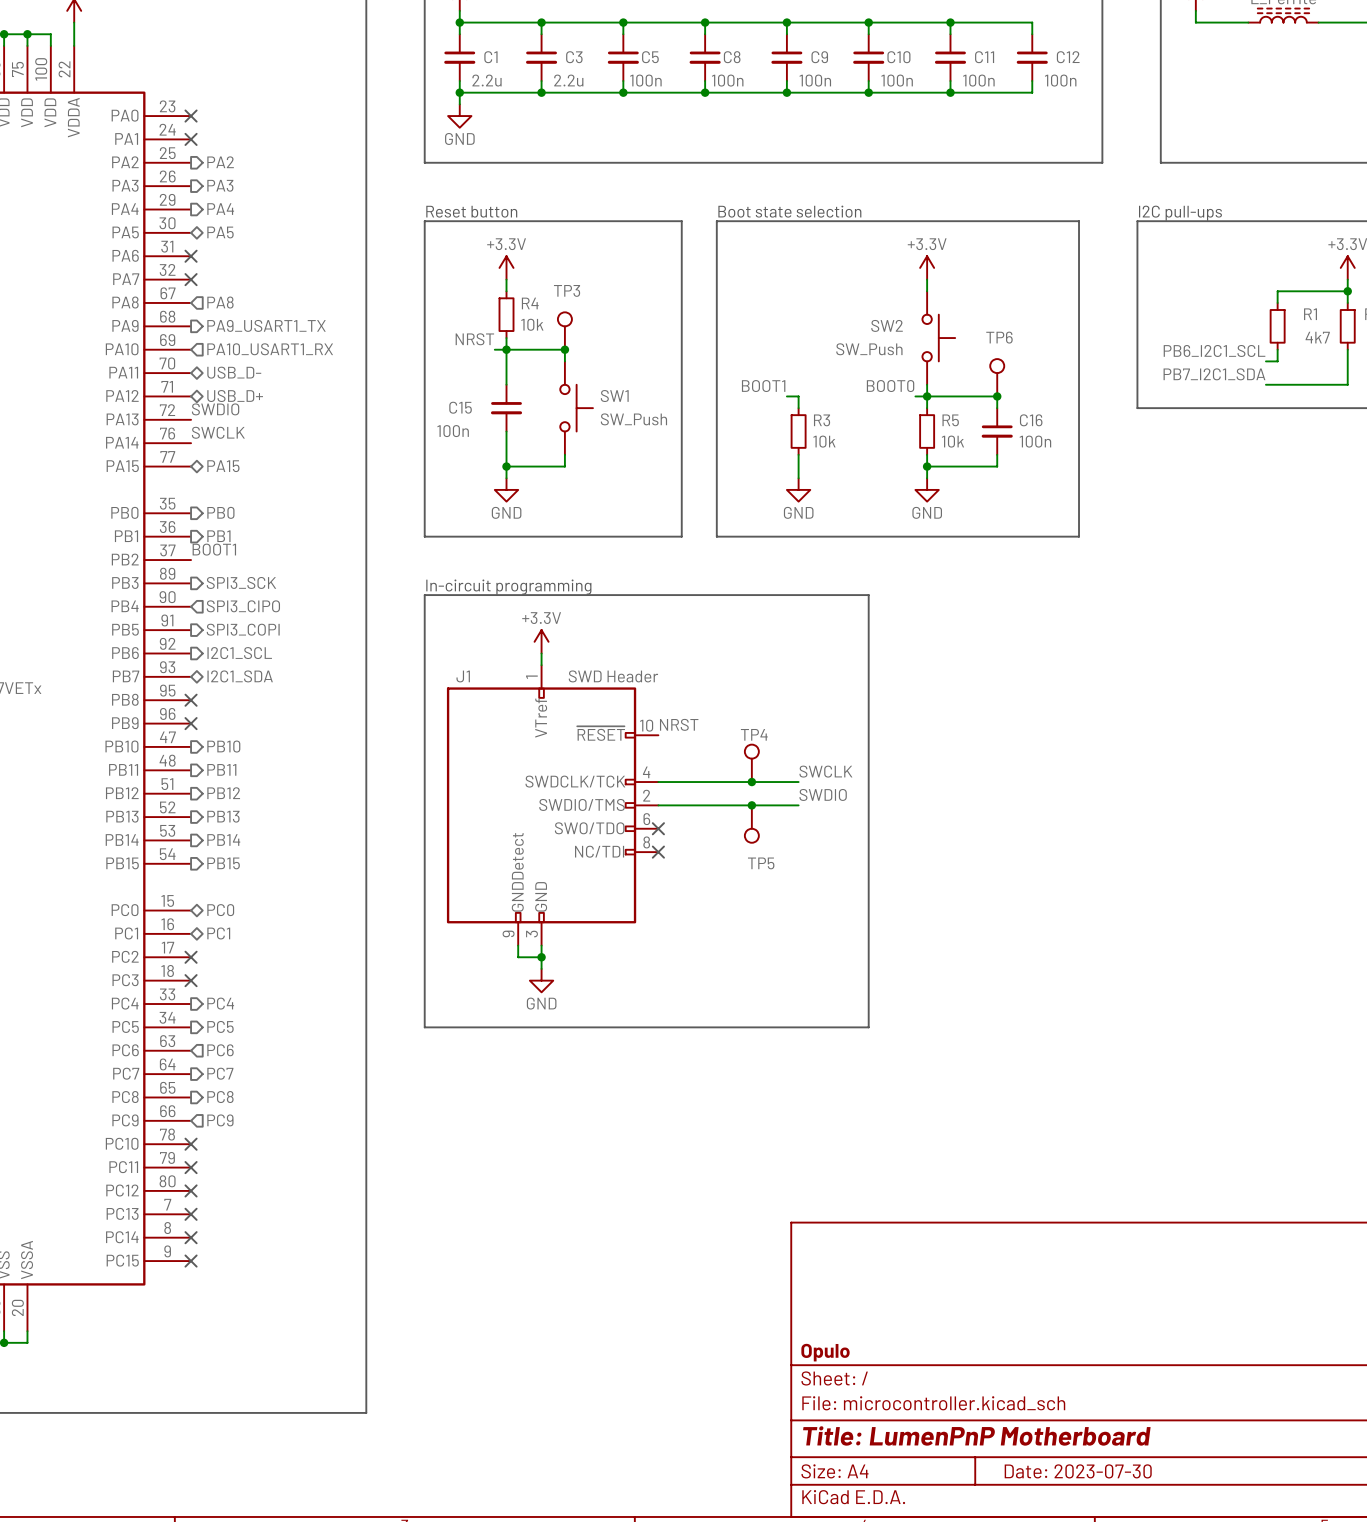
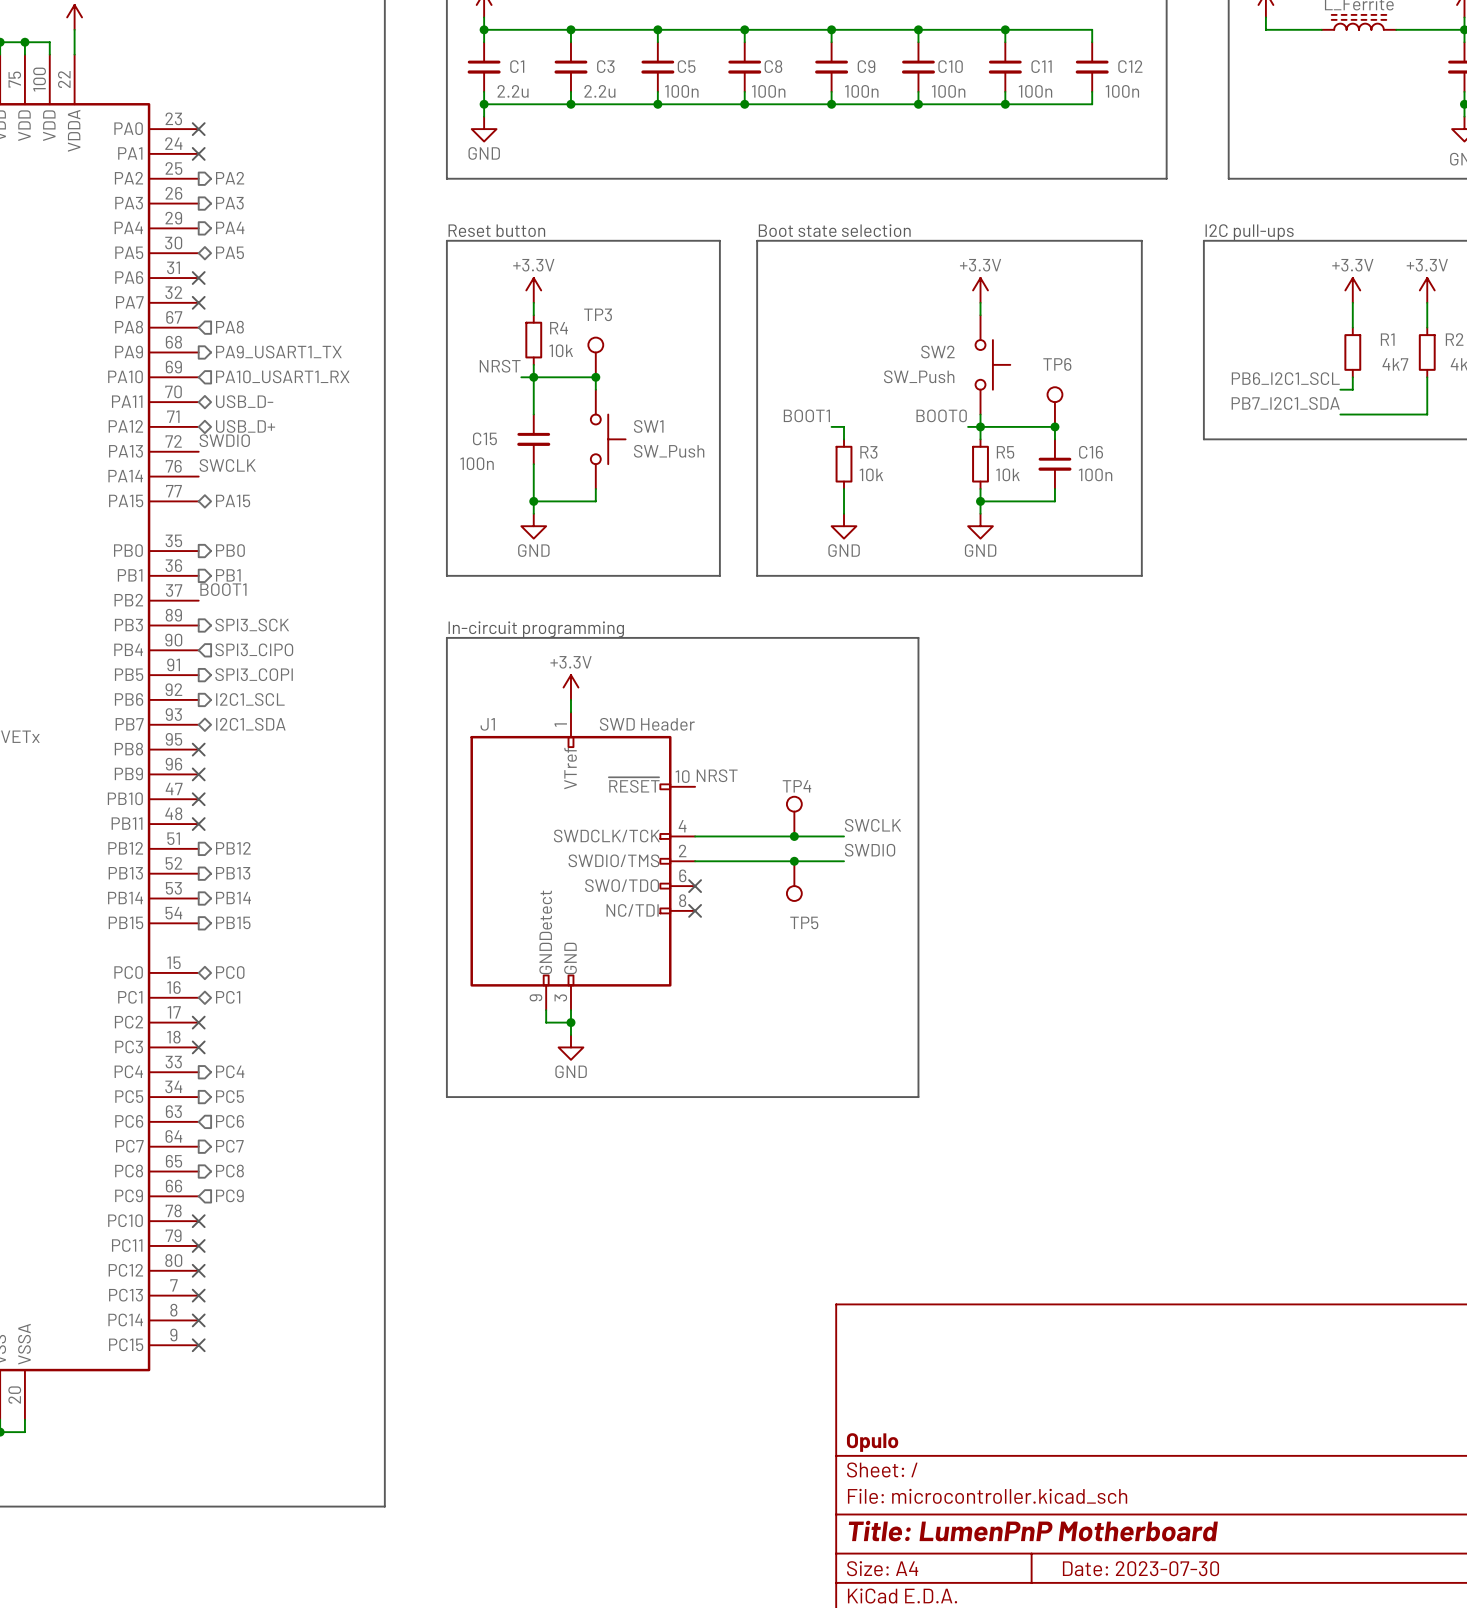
power symbol: none -> +3.3V (1352, 290)
wire: (1277, 291) (1347, 291) -> (1352, 315) (1352, 302)
junction: (1347, 291) -> none
no-connect mark: none -> (198, 799)
hierarchical label: PB10 (223, 746) -> none
hierarchical label: PB11 (221, 769) -> none
no-connect mark: none -> (198, 824)

